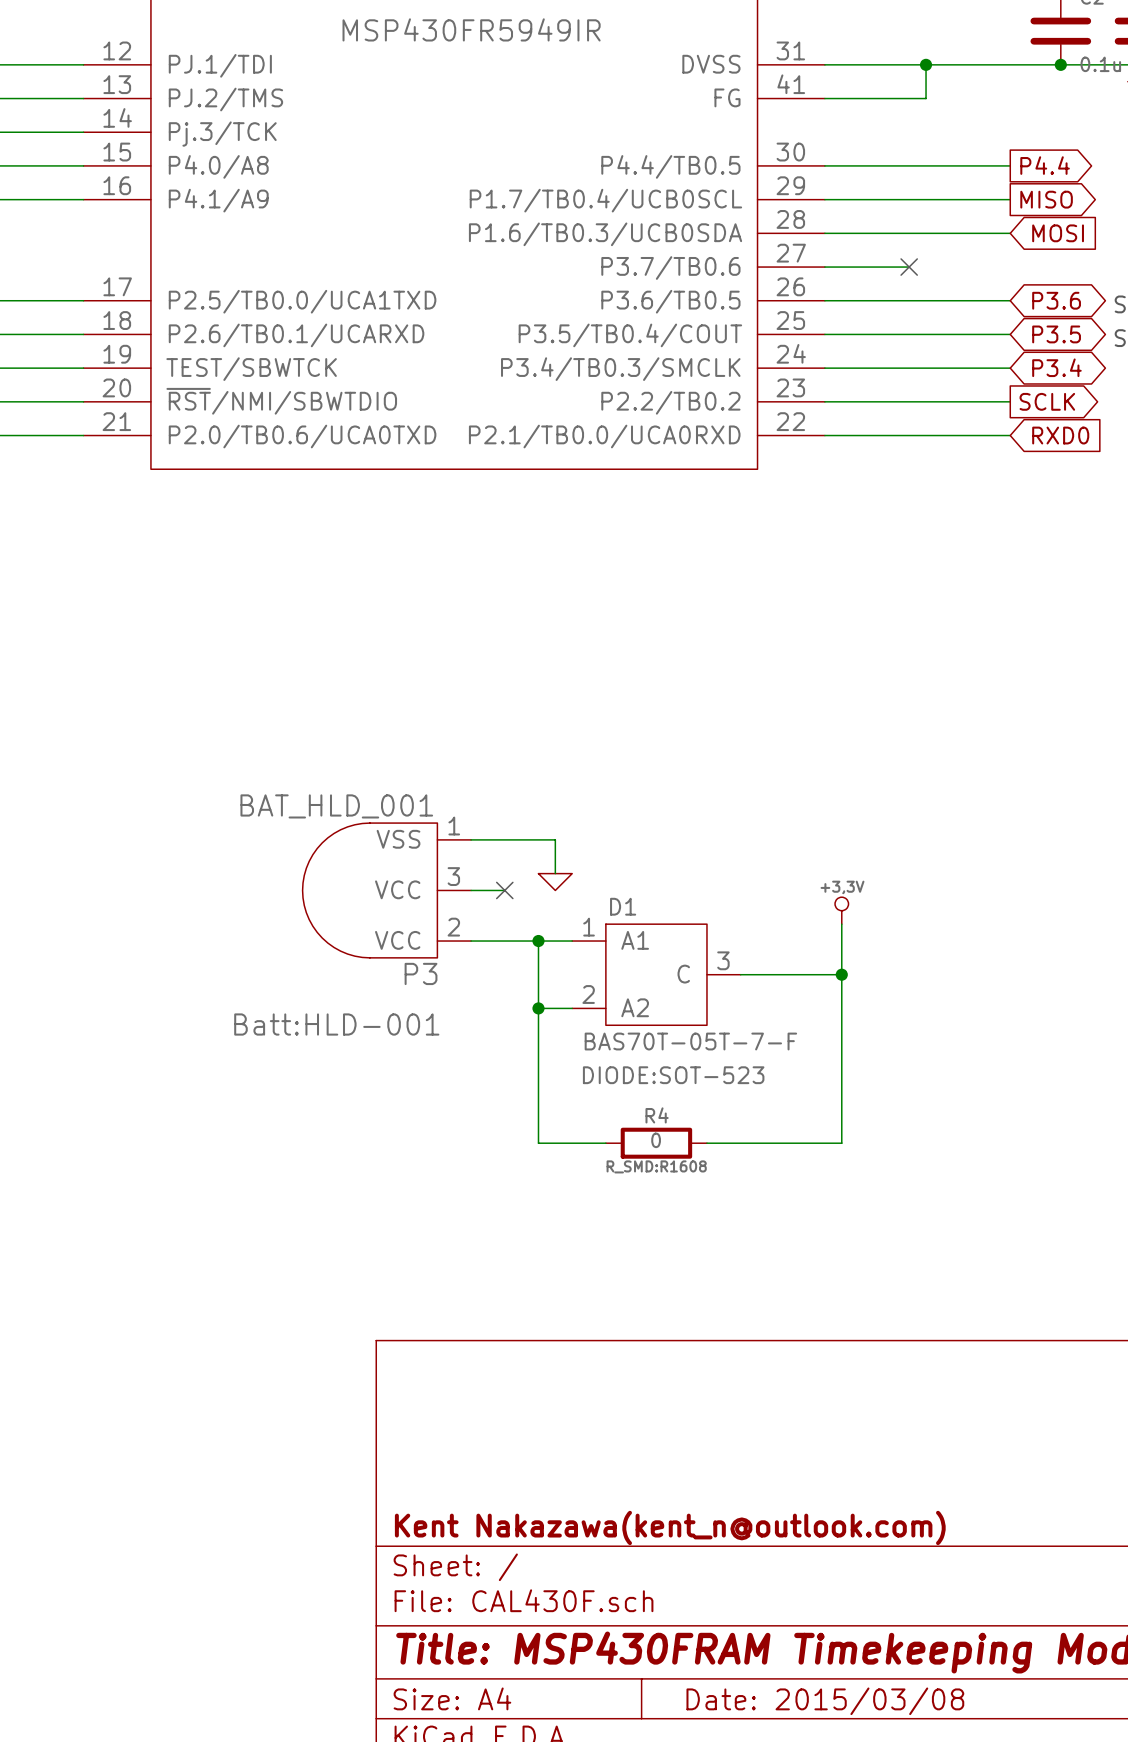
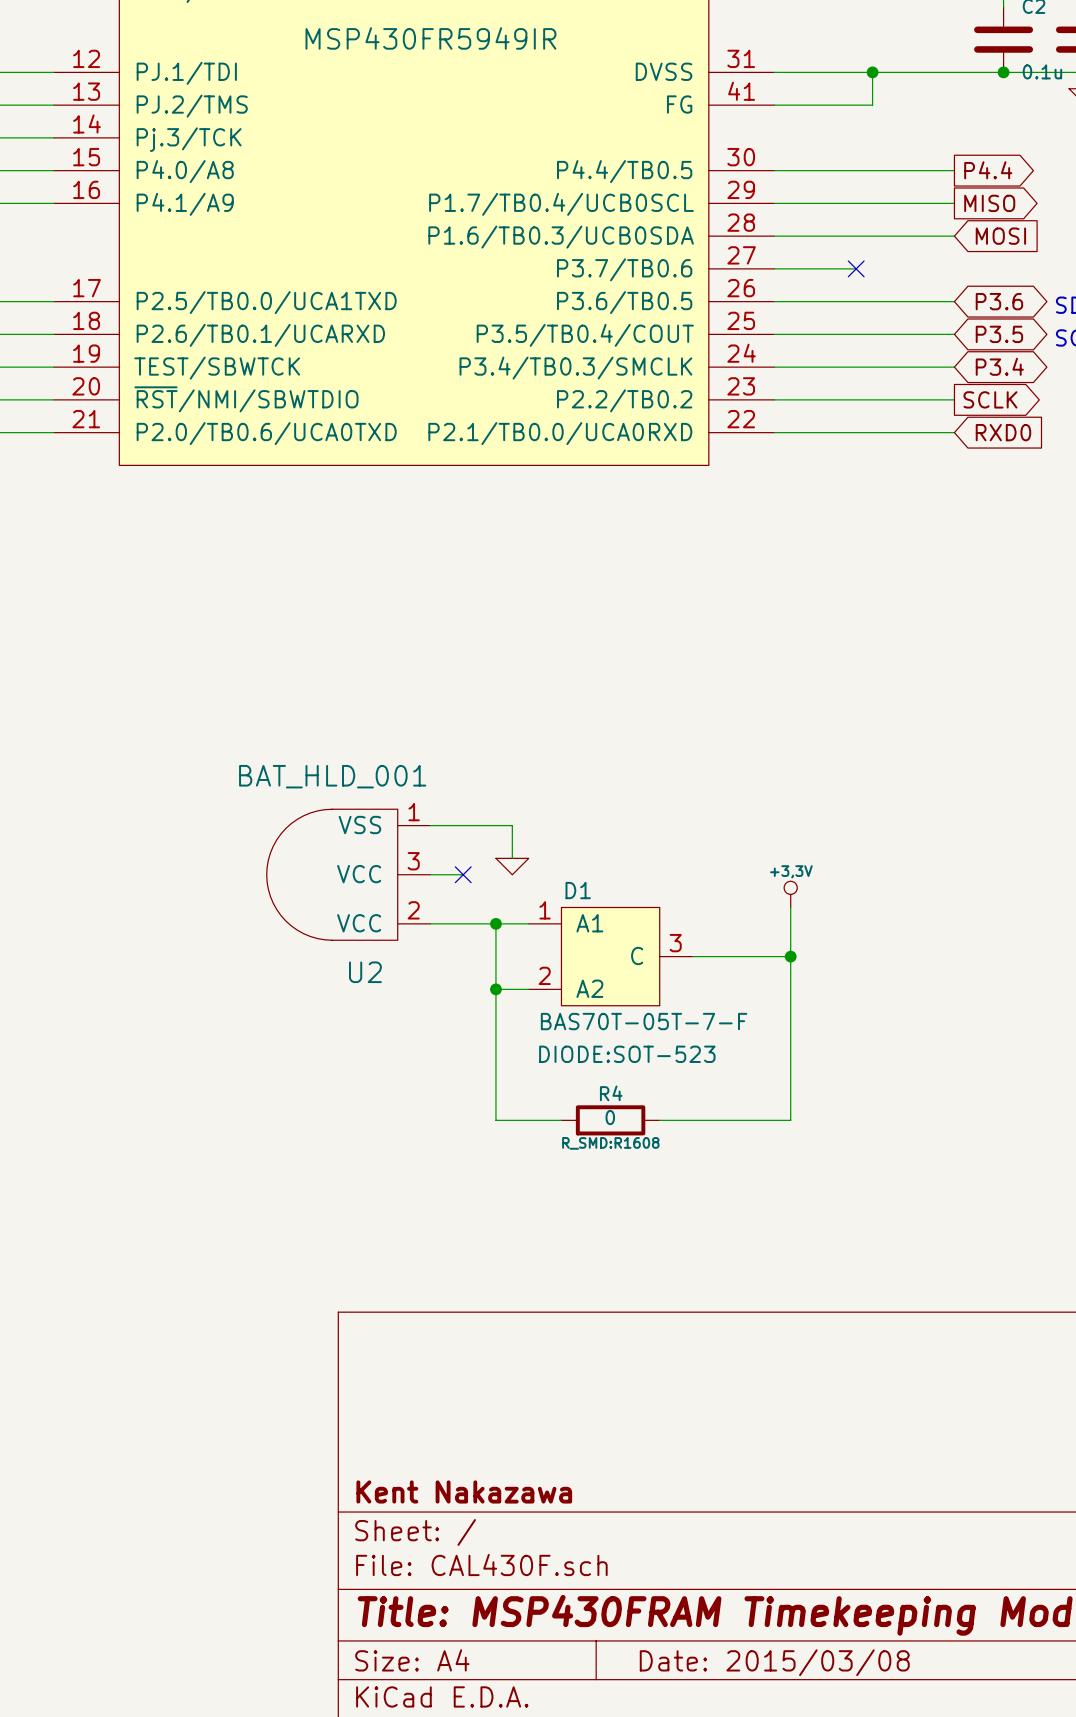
P3 value position: BAT_HLD_001 (336, 806) -> BAT_HLD_001 (332, 776)
P3 name: P3 (421, 973) -> U2 (365, 972)
P3 text: Batt:HLD-001 (336, 1024) -> none
title block: Kent Nakazawa(kent_n@outlook.com) (670, 1527) -> Kent Nakazawa (464, 1491)

